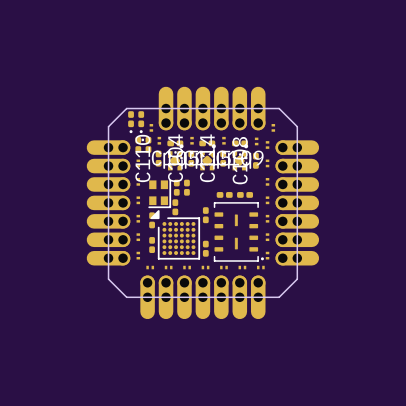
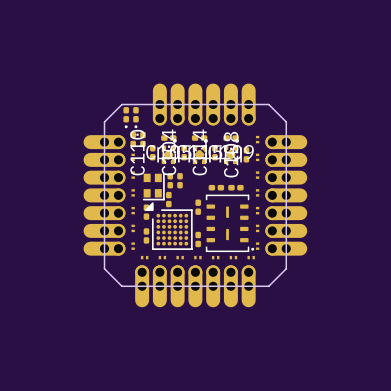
part: (151, 127) -> none
part: (273, 127) -> none
part: (159, 140) -> none
part: (192, 140) -> none
part: (223, 140) -> none
part: (256, 141) -> none

